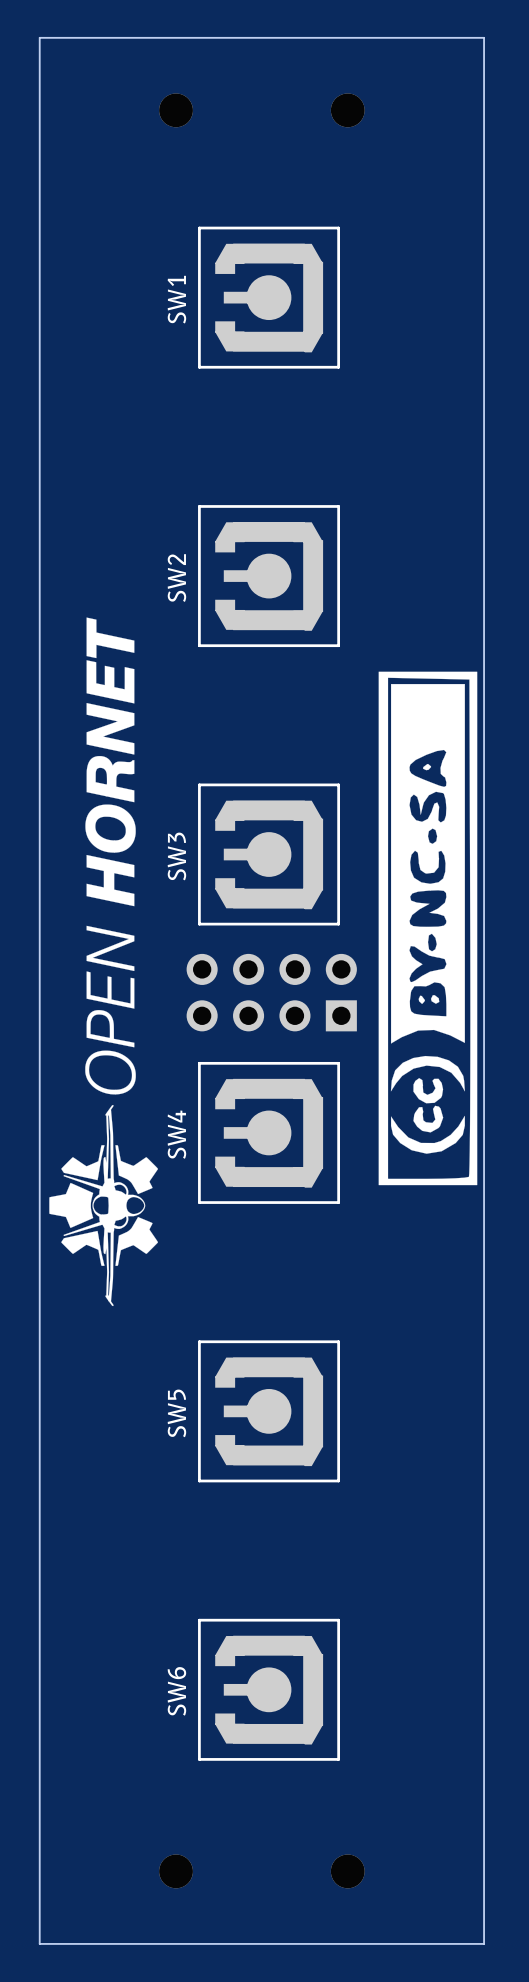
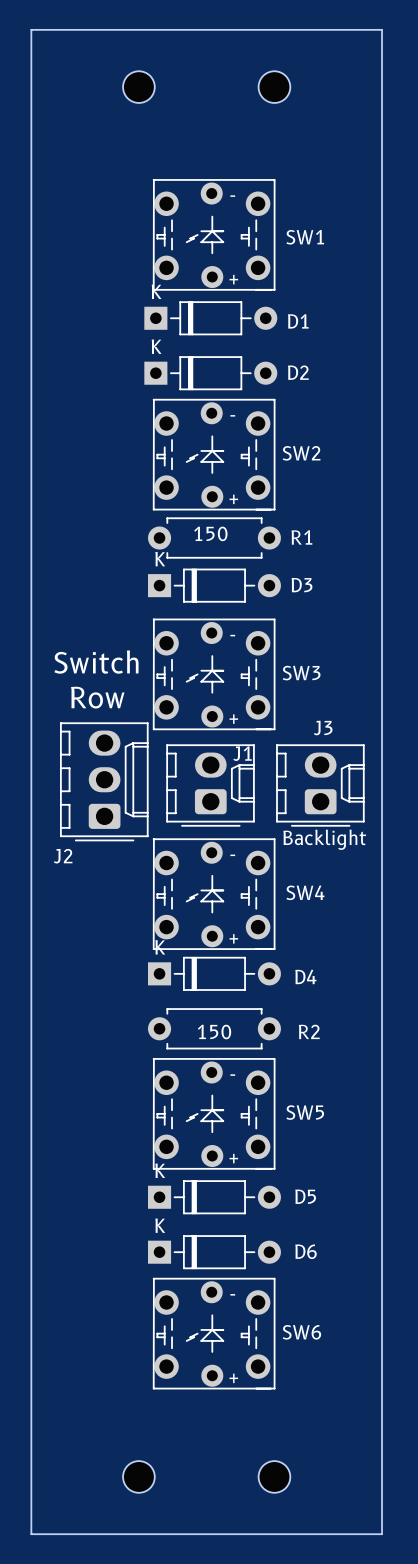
part footprint: [159, 93, 193, 128] -> [123, 71, 155, 103]
part footprint: [330, 93, 365, 128] -> [258, 71, 291, 103]
SW1 footprint: [198, 226, 340, 369] -> [152, 179, 276, 291]
SW1 name position: SW1 (176, 299) -> SW1 (305, 237)
D1: none -> (210, 318)
D2: none -> (210, 373)
SW2 footprint: [198, 505, 340, 648] -> [152, 398, 276, 511]
SW2 name position: SW2 (176, 578) -> SW2 (301, 453)
drawing: [49, 617, 158, 1307] -> none
drawing: [378, 671, 478, 1186] -> none
text: none -> 150 (210, 533)
R1: none -> (214, 538)
D3: none -> (214, 585)
SW3 footprint: [198, 783, 340, 926] -> [152, 618, 276, 731]
text: none -> Switch (96, 662)
SW3 name position: SW3 (176, 856) -> SW3 (301, 673)
text: none -> Row (97, 697)
J2: none -> (104, 781)
part: (271, 992) -> none
J1: none -> (210, 785)
J3: none -> (320, 785)
SW4 footprint: [198, 1061, 340, 1204] -> [152, 838, 276, 950]
text: none -> Backlight (324, 839)
SW4 name position: SW4 (176, 1134) -> SW4 (305, 892)
D4: none -> (214, 973)
R2: none -> (214, 1028)
text: none -> 150 (214, 1031)
SW5 footprint: [198, 1340, 340, 1483] -> [152, 1058, 276, 1170]
SW5 name position: SW5 (176, 1413) -> SW5 (305, 1112)
D5: none -> (214, 1197)
D6: none -> (214, 1252)
SW6 footprint: [198, 1618, 340, 1761] -> [152, 1277, 276, 1390]
SW6 name position: SW6 (176, 1691) -> SW6 (301, 1332)
part footprint: [159, 1854, 193, 1889] -> [123, 1461, 155, 1493]
part footprint: [330, 1854, 365, 1889] -> [258, 1461, 291, 1493]

